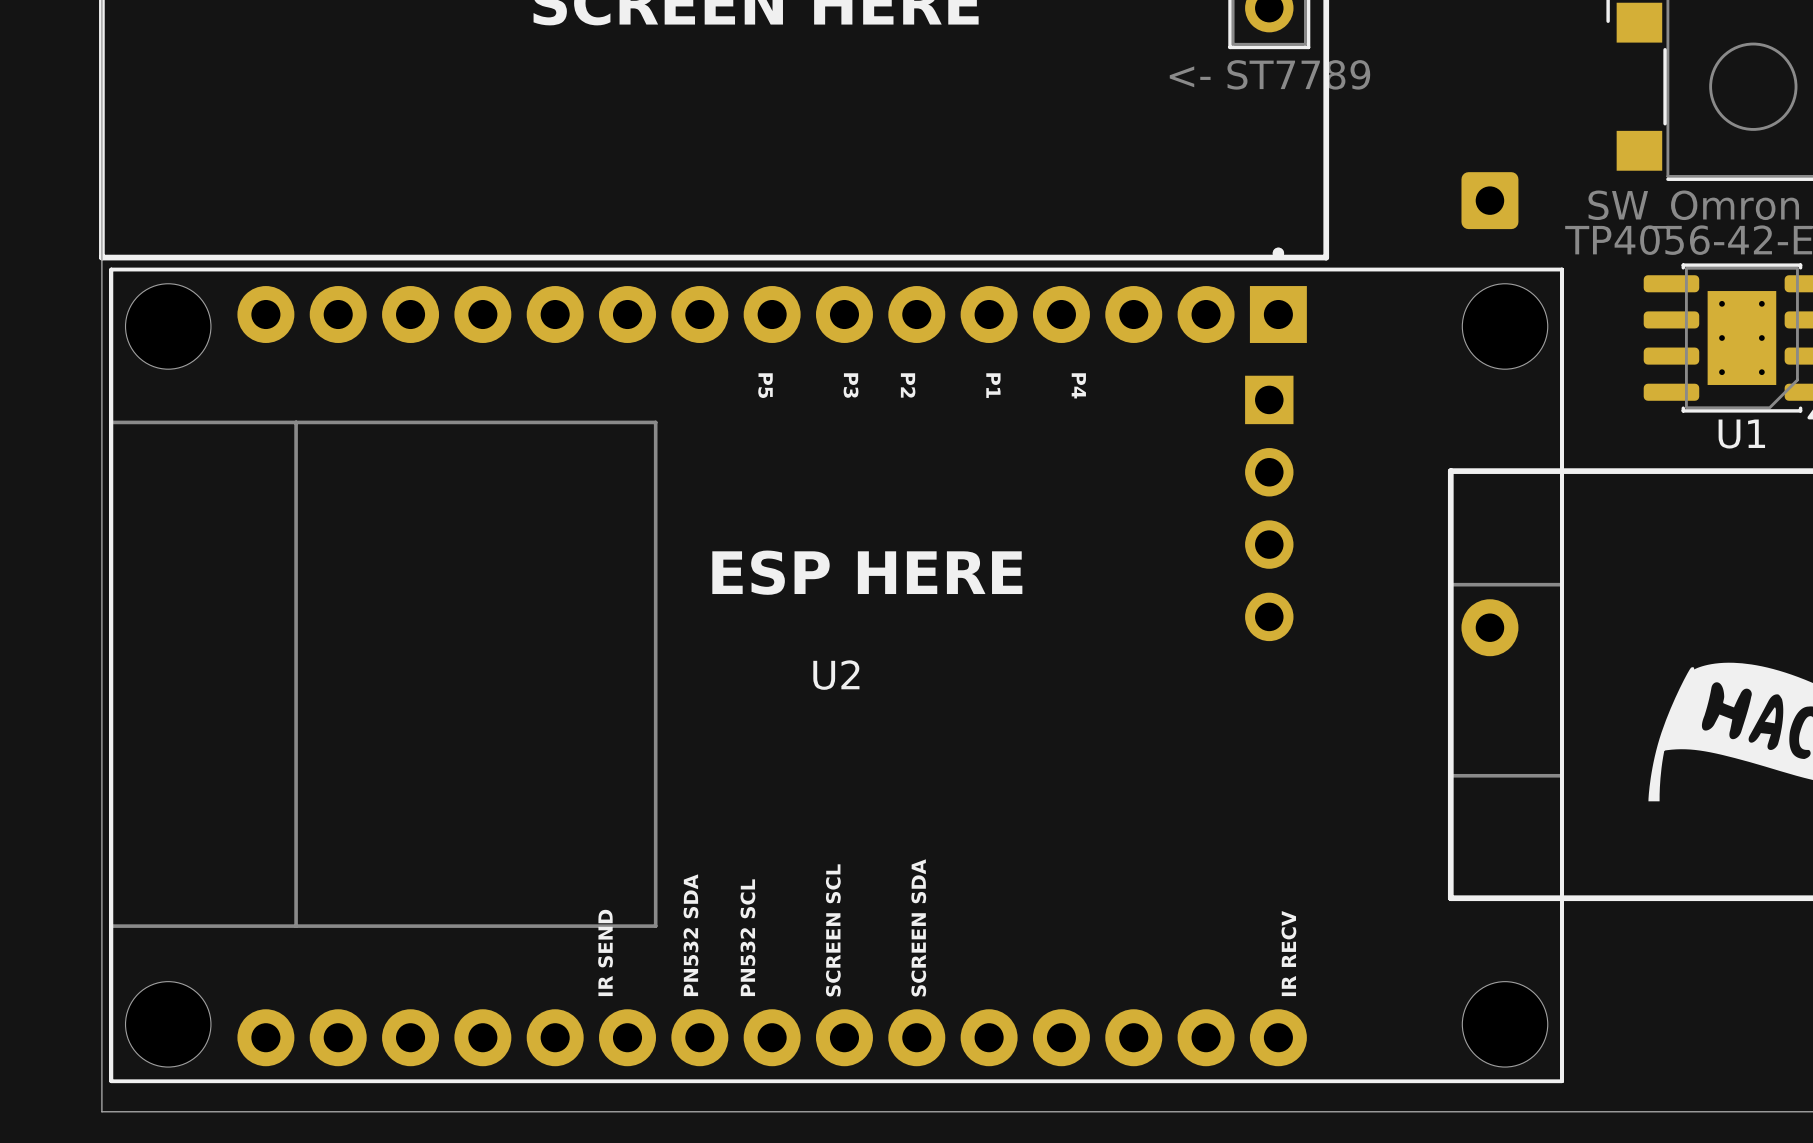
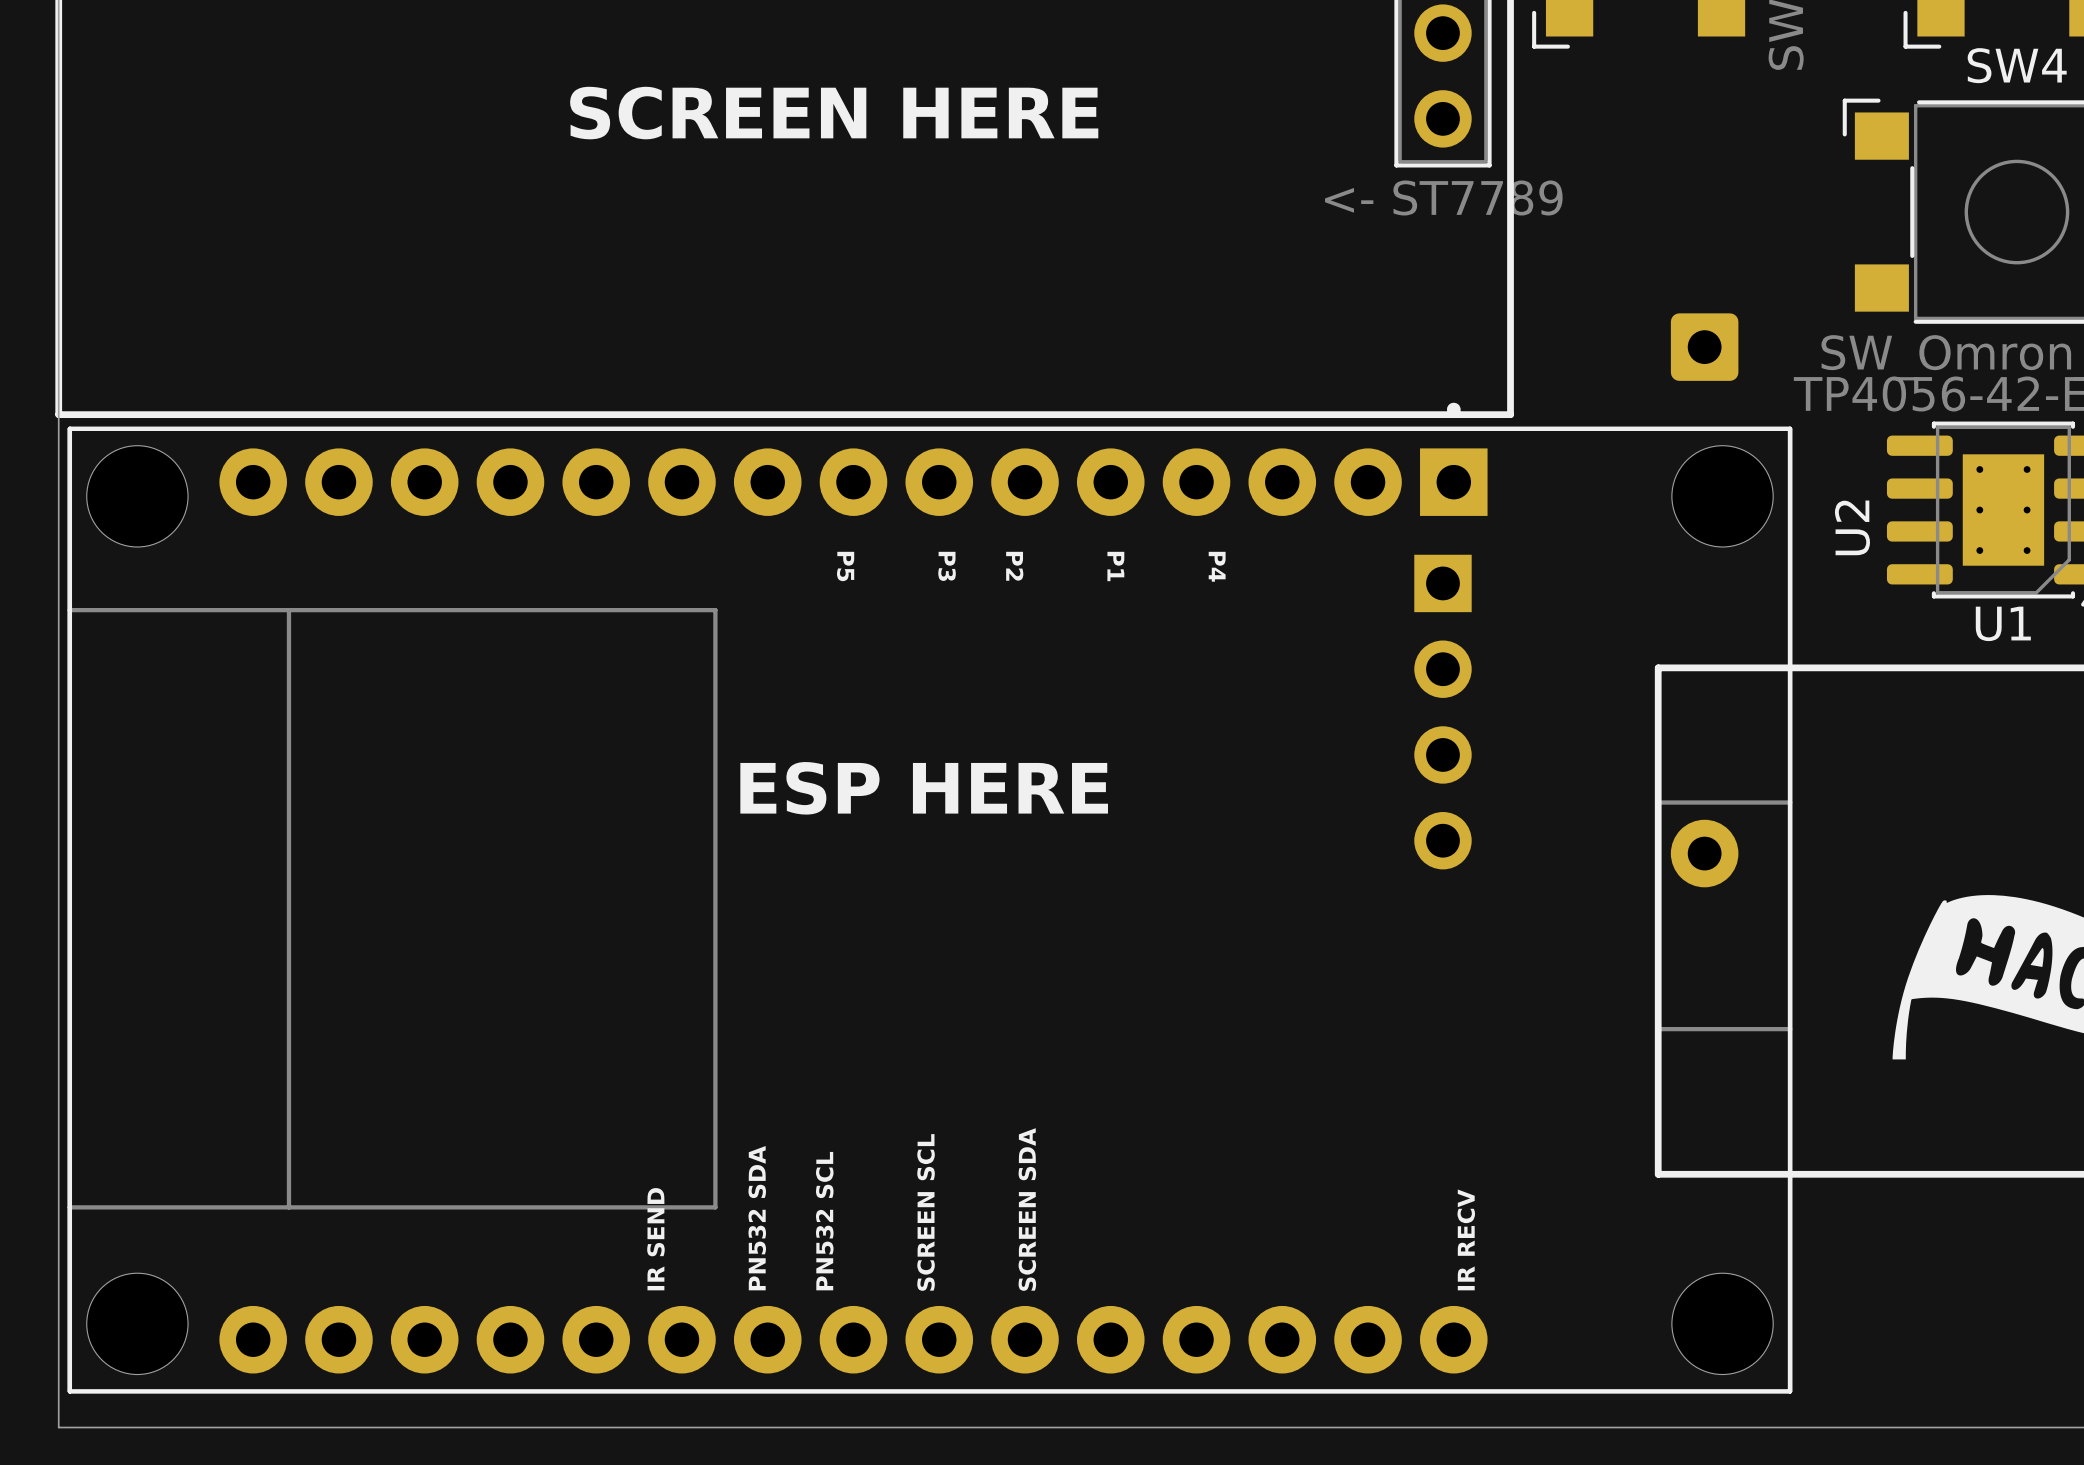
text position: ESP HERE (867, 572) -> ESP HERE (924, 788)
U2 name rotation: 0° (836, 675) -> 90° counterclockwise (1852, 527)
U2 name position: U2 (836, 675) -> U2 (1852, 527)

